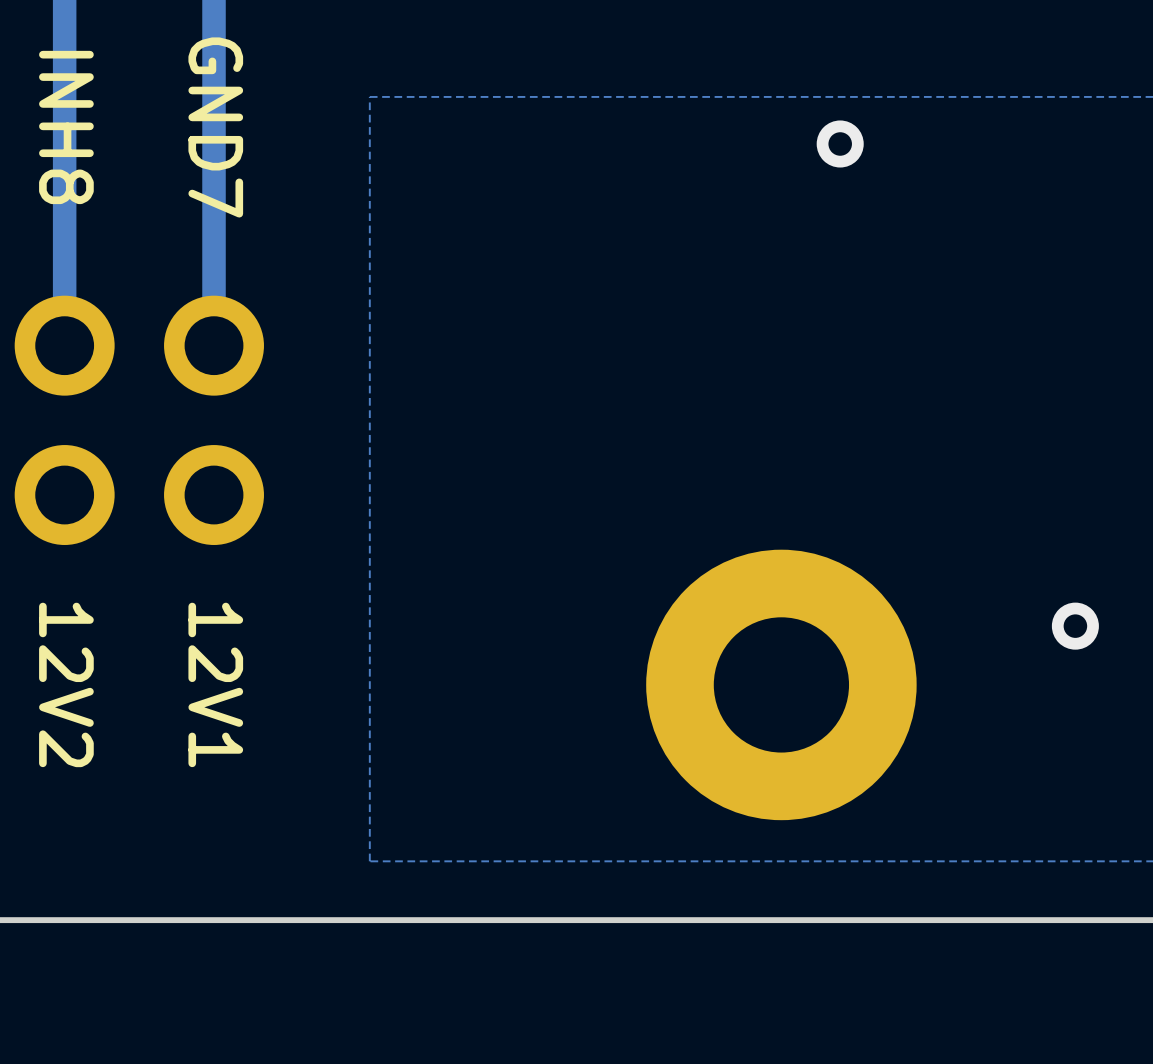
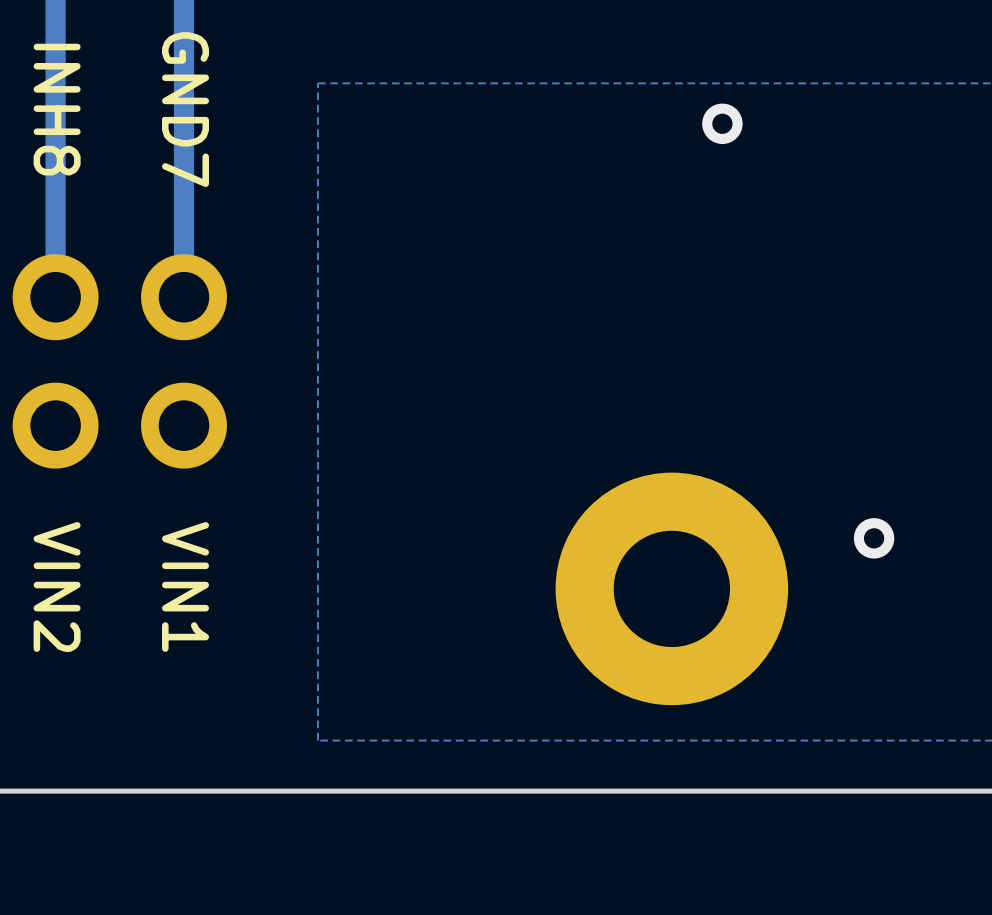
via position: (1075, 626) -> (874, 538)
text: 12V2 (66, 684) -> VIN2 (57, 586)
text: 12V1 (215, 684) -> VIN1 (185, 586)

